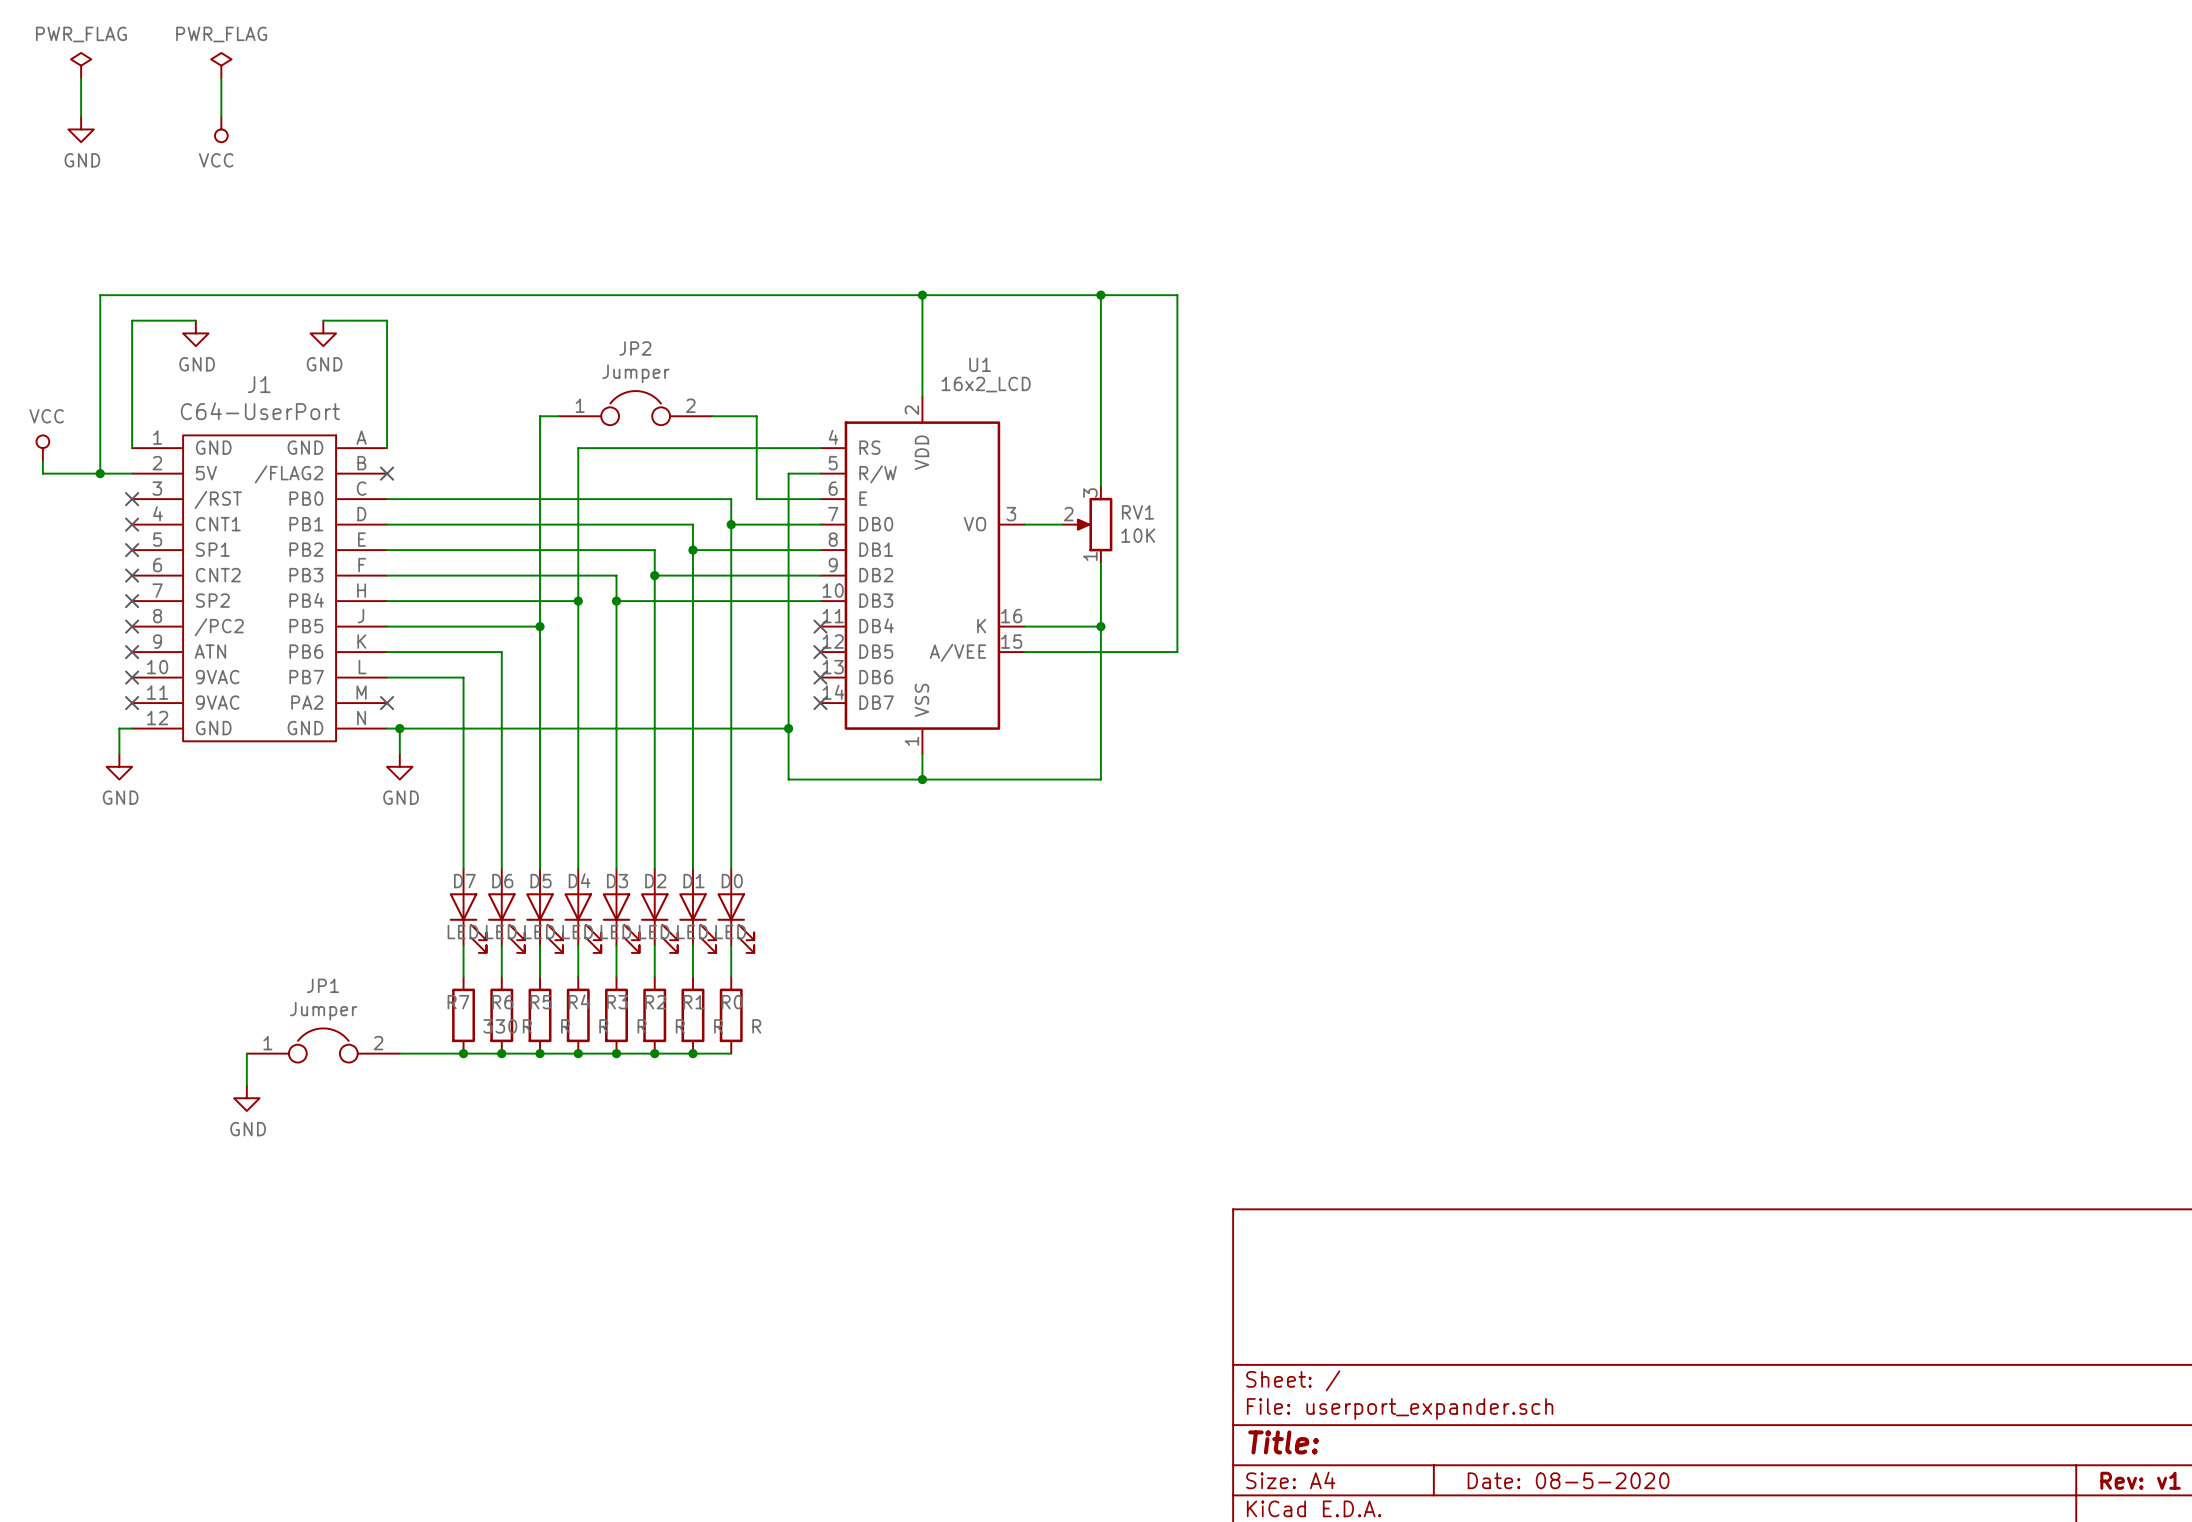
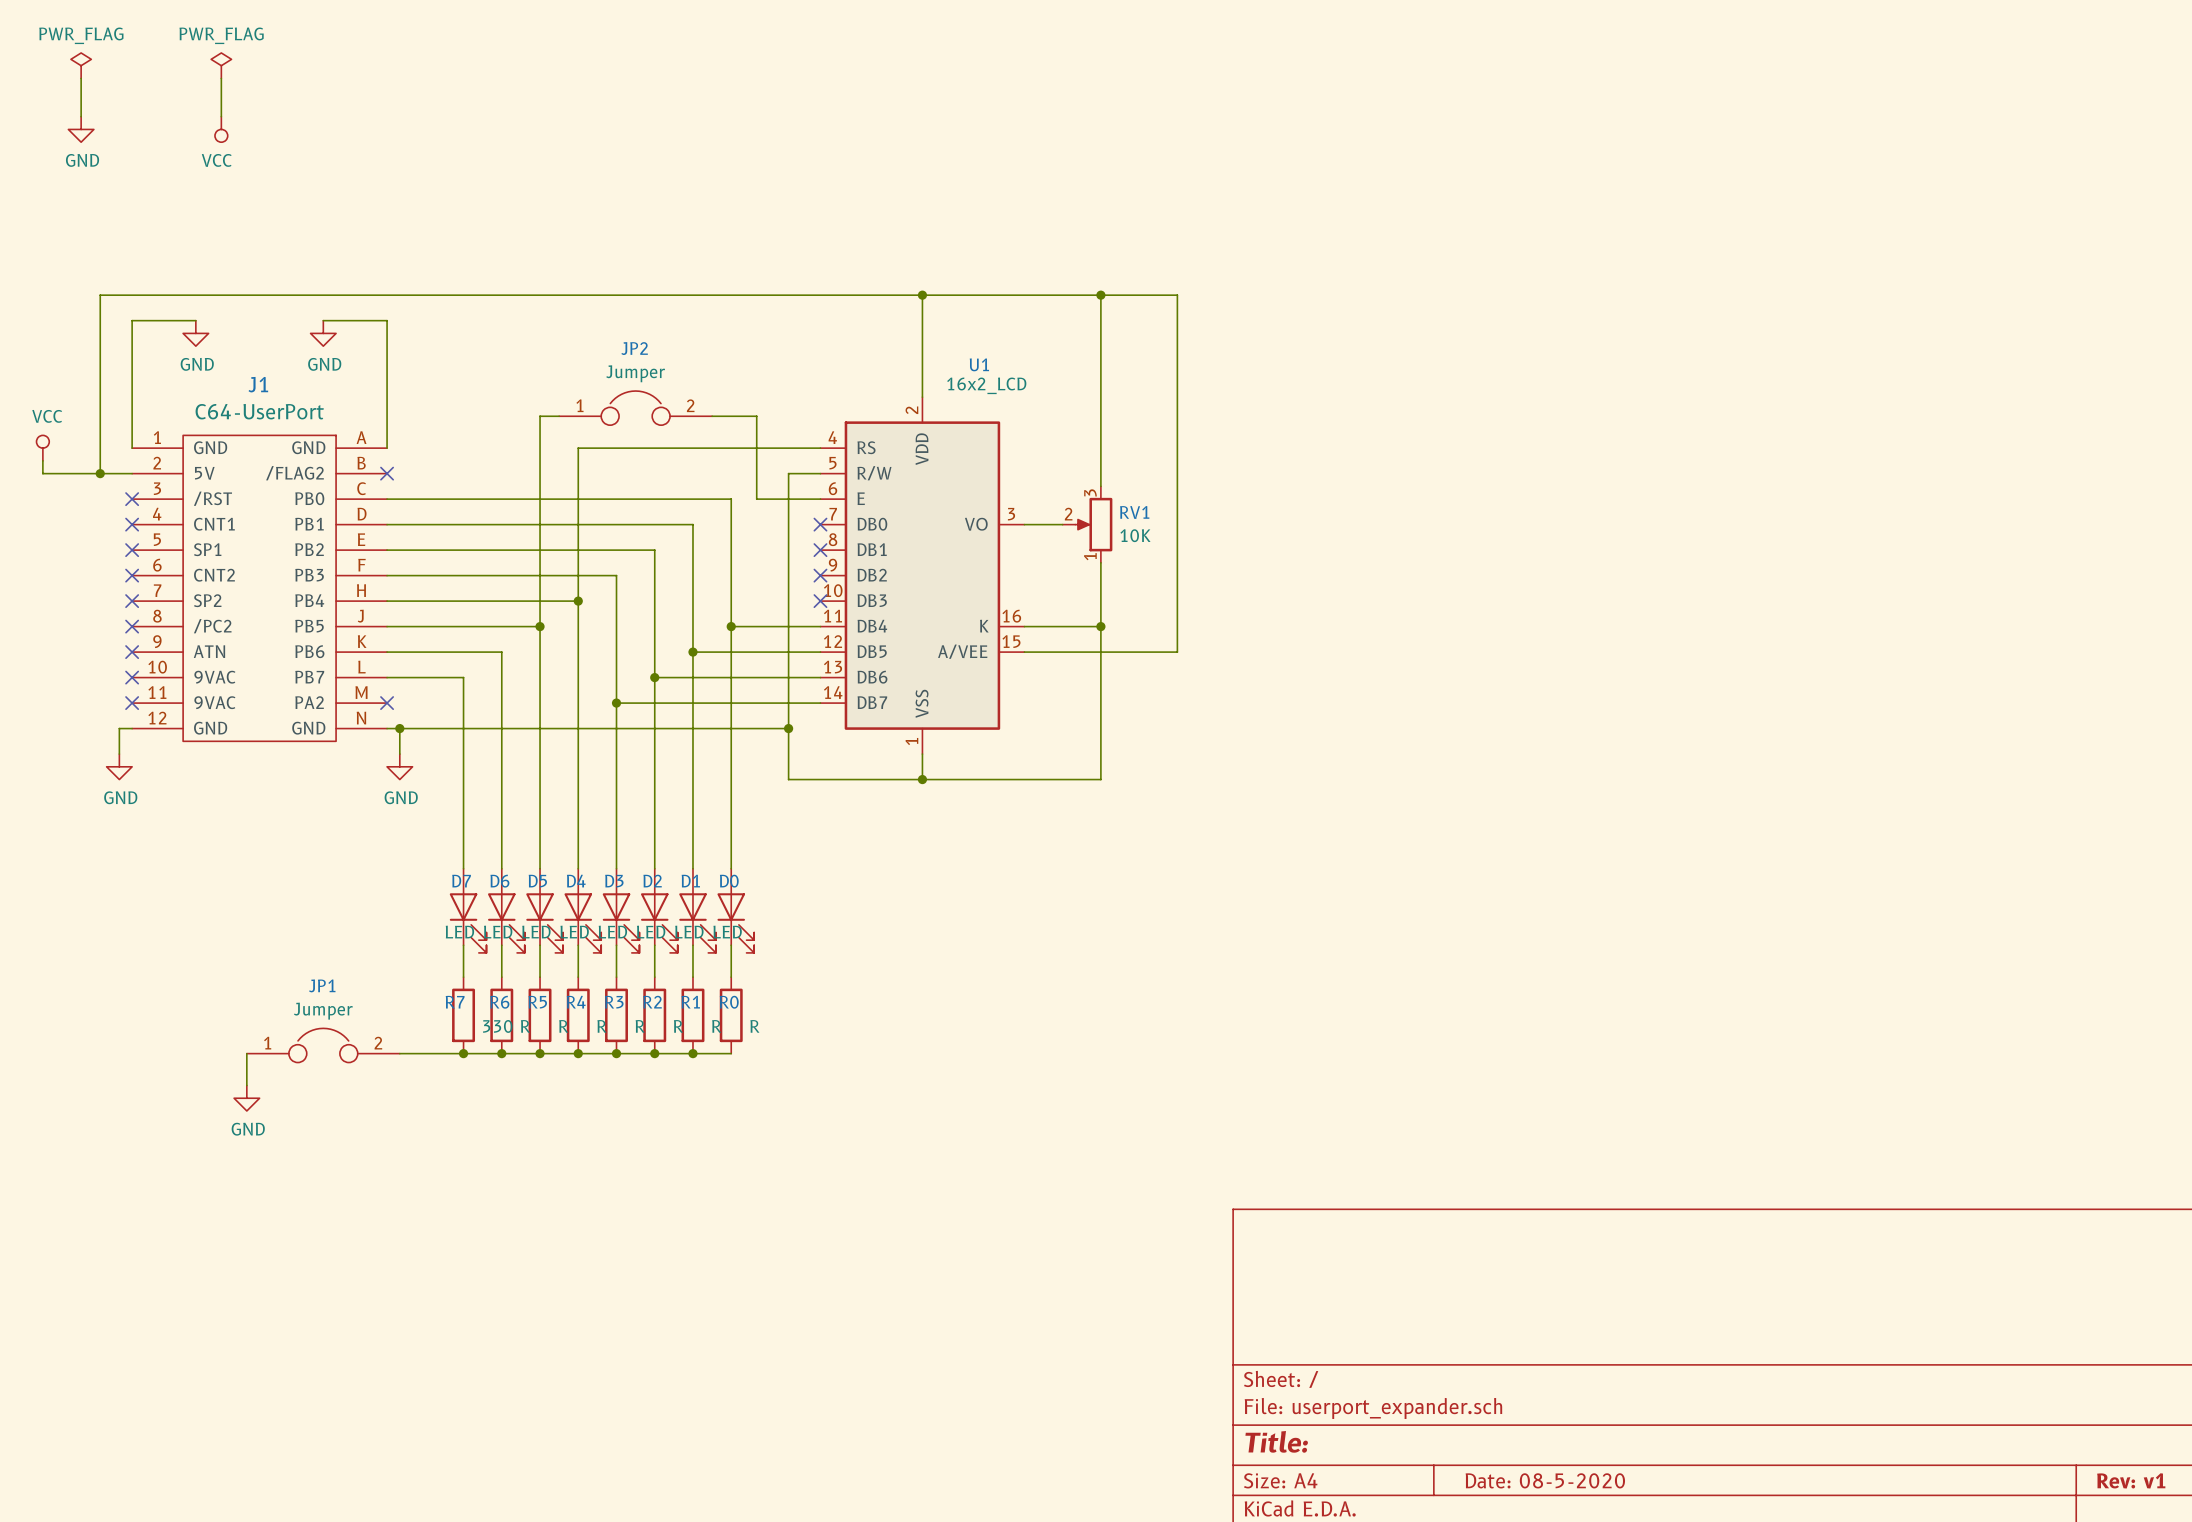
wire: (731, 524) (820, 524) -> (731, 626) (820, 626)
junction: (731, 524) -> none
no-connect mark: none -> (820, 524)
wire: (692, 550) (820, 550) -> (692, 652) (820, 652)
junction: (692, 550) -> none
no-connect mark: none -> (820, 550)
wire: (654, 575) (820, 575) -> (654, 677) (820, 677)
junction: (654, 575) -> none
no-connect mark: none -> (820, 575)
wire: (616, 601) (820, 601) -> (616, 703) (820, 703)
junction: (616, 601) -> none
no-connect mark: none -> (820, 601)
junction: none -> (731, 626)
no-connect mark: (820, 626) -> none
junction: none -> (692, 652)
no-connect mark: (820, 652) -> none
junction: none -> (654, 677)
no-connect mark: (820, 677) -> none
junction: none -> (616, 703)
no-connect mark: (820, 703) -> none

